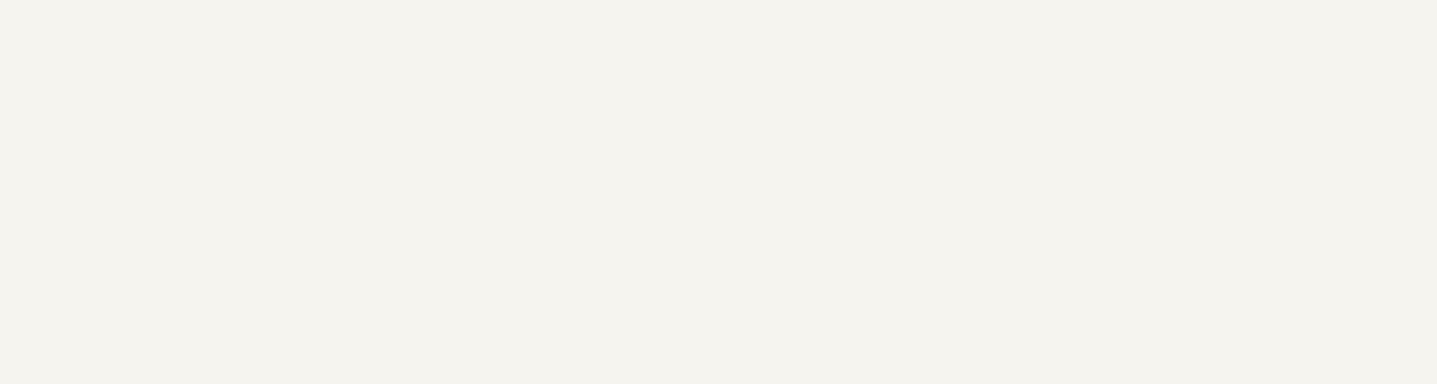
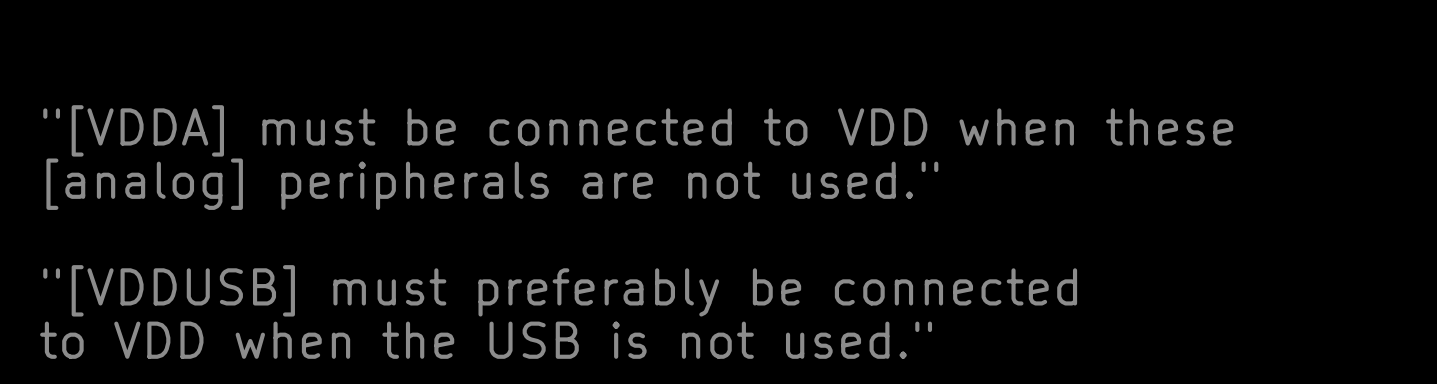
text: none -> "[VDDA] must be connected to VDD when these (638, 130)
text: none -> [analog] peripherals are not used." (492, 184)
text: none -> "[VDDUSB] must preferably be connected (560, 290)
text: none -> to VDD when the USB is not used." (486, 340)

